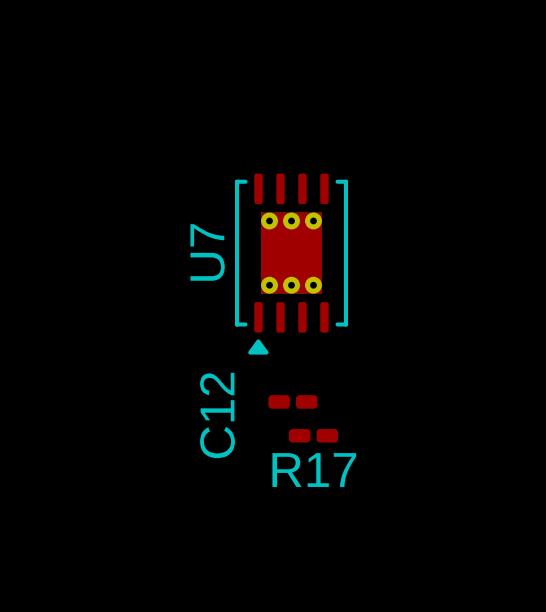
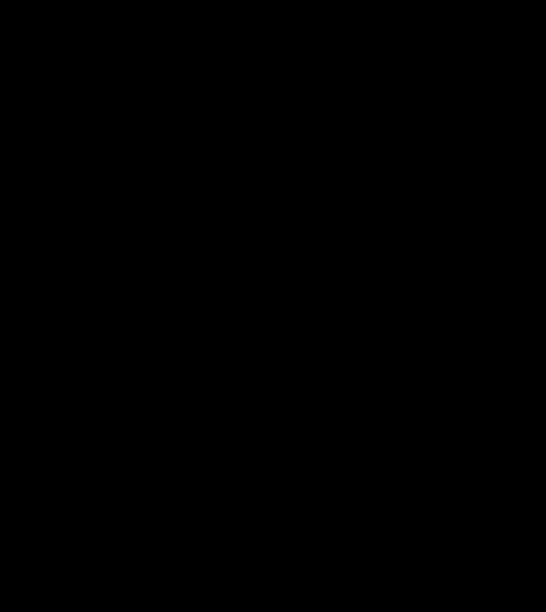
U7: (291, 264) -> none
C12: (292, 401) -> none
R17: (313, 435) -> none

